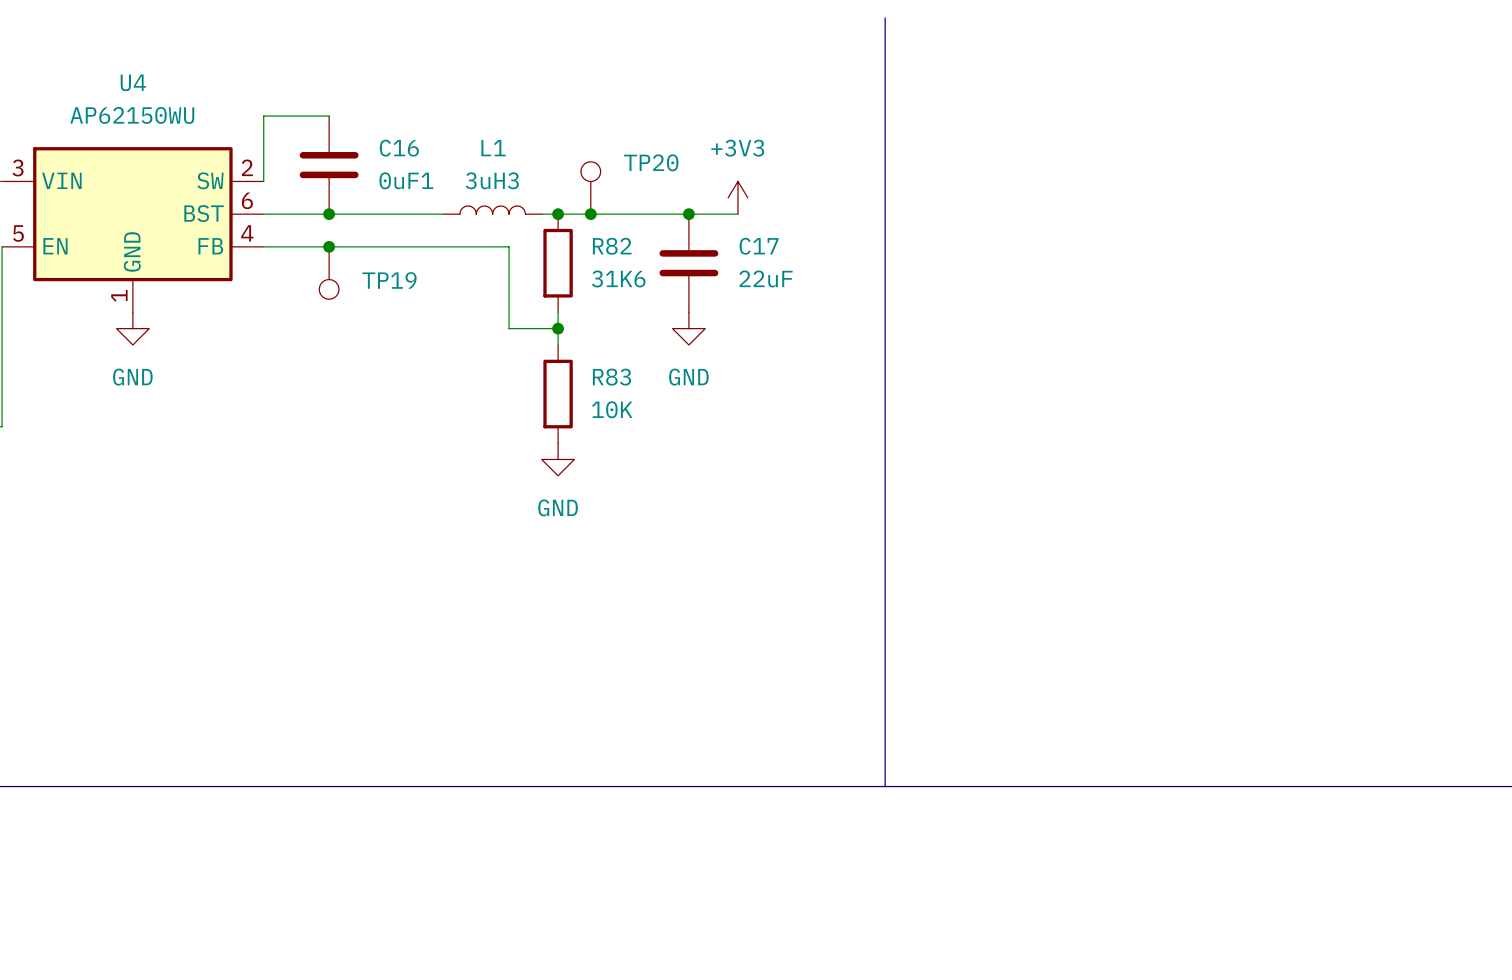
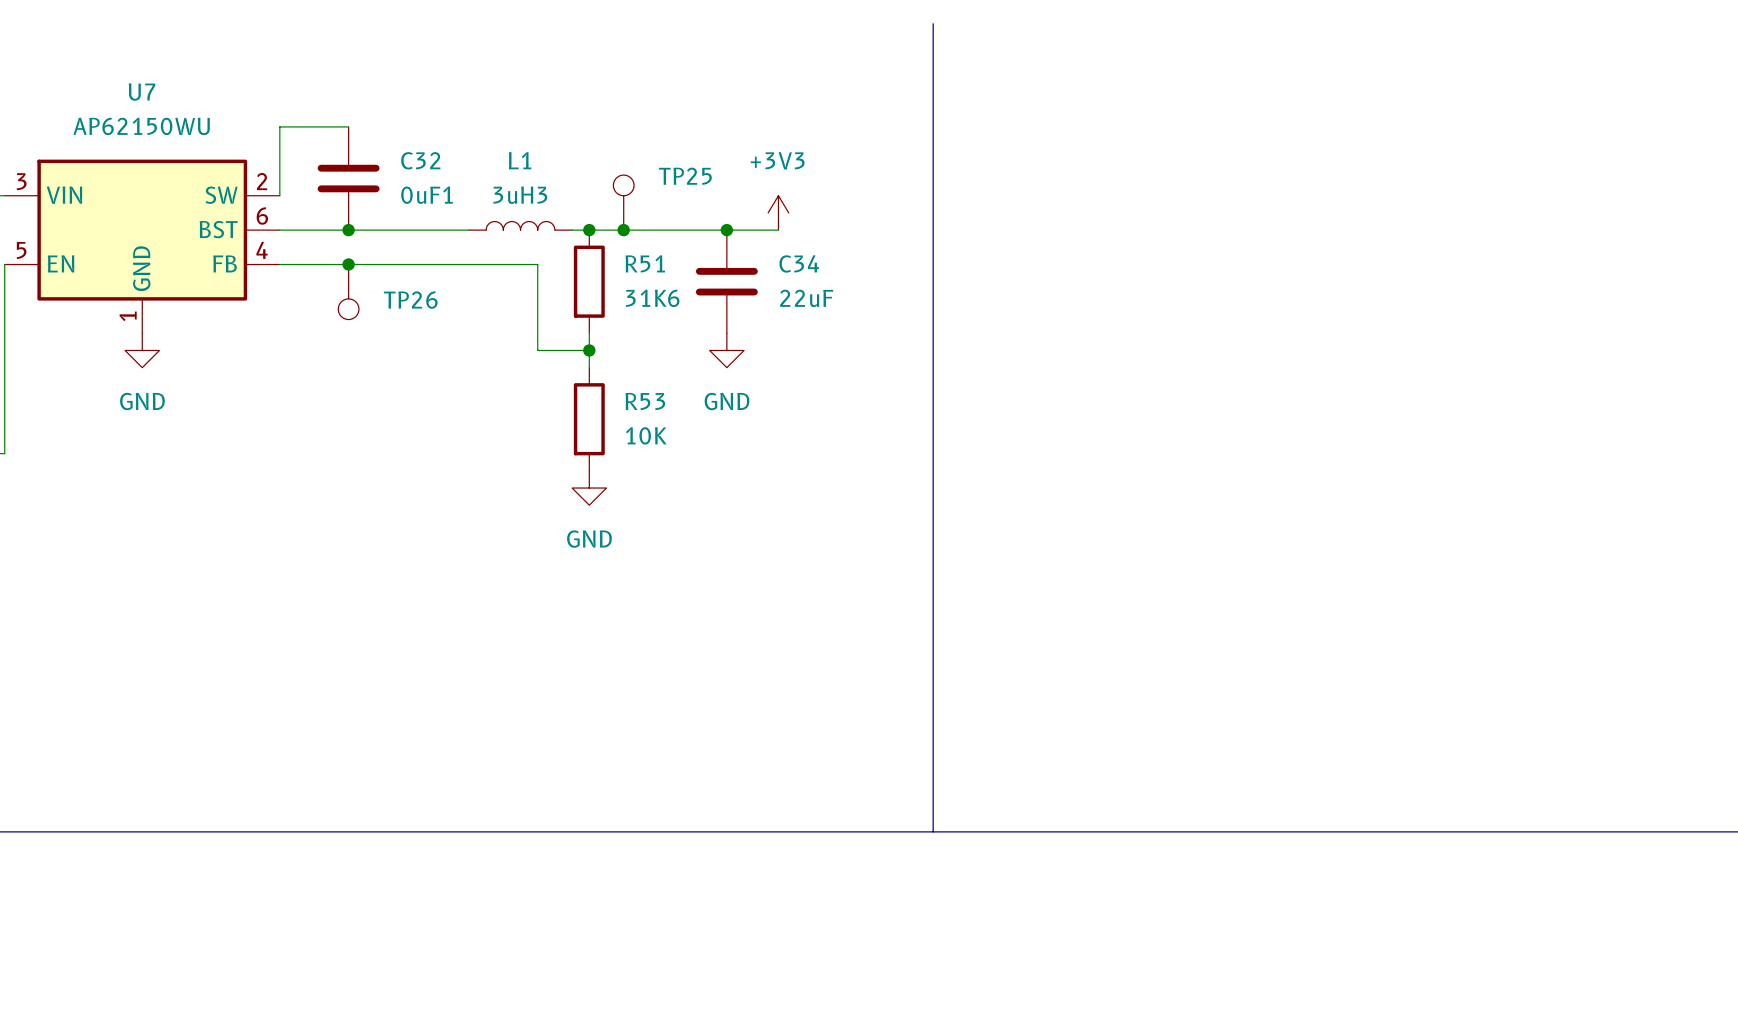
U4 name: U4 (133, 82) -> U7 (141, 92)
C16 name: C16 (399, 148) -> C32 (420, 160)
TP20 name: TP20 (651, 162) -> TP25 (685, 176)
R82 name: R82 (612, 246) -> R51 (645, 263)
C17 name: C17 (759, 246) -> C34 (799, 263)
TP19 name: TP19 (389, 280) -> TP26 (410, 300)
R83 name: R83 (611, 377) -> R53 (645, 401)

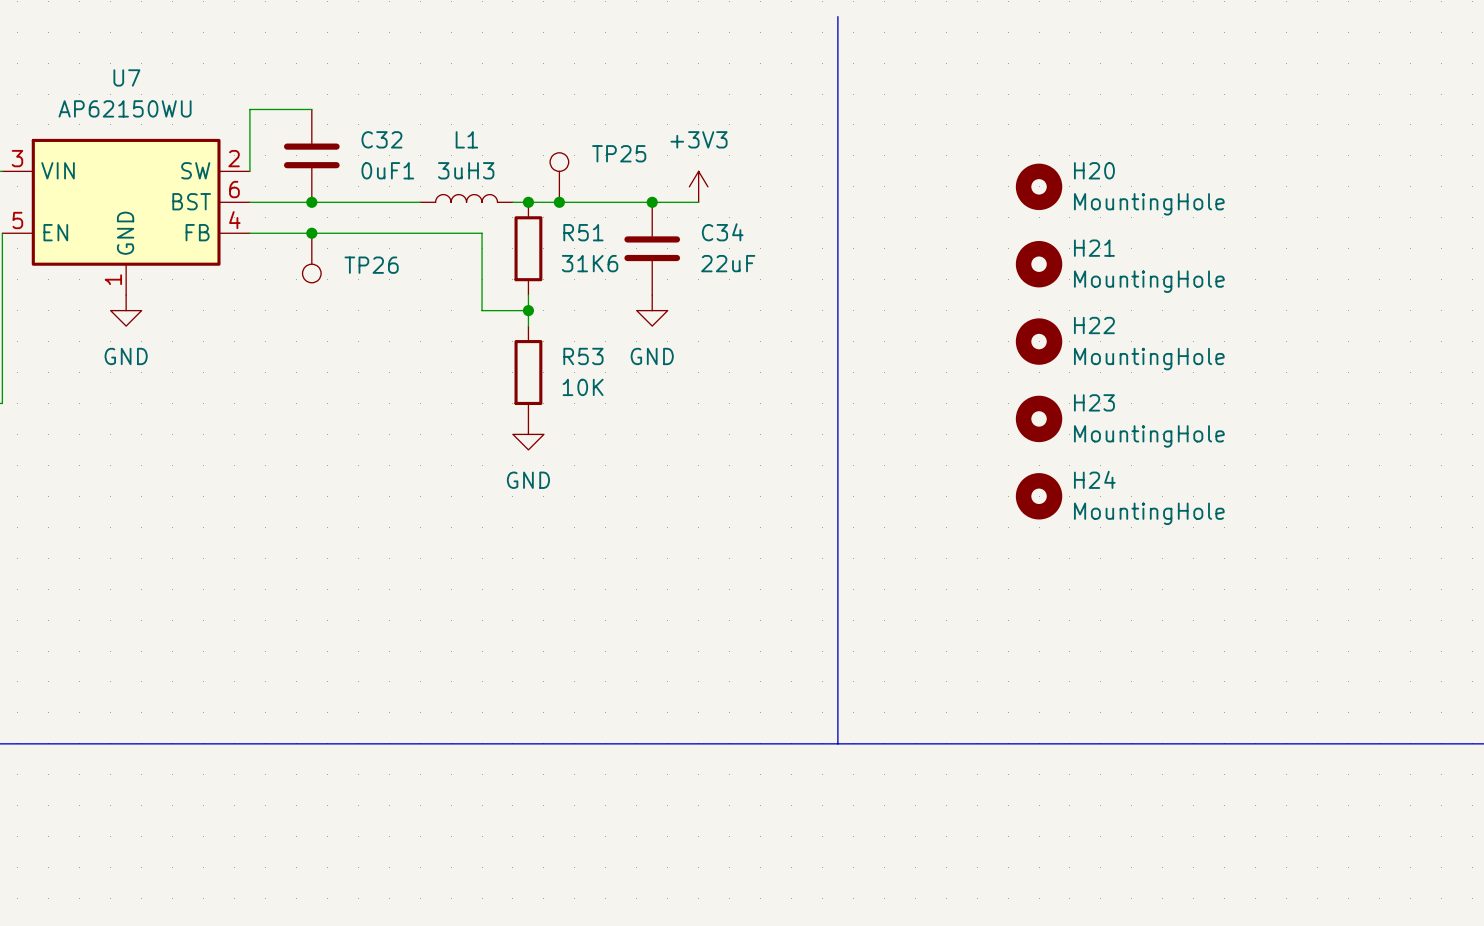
H20: none -> MountingHole (1039, 186)
H21: none -> MountingHole (1039, 264)
H22: none -> MountingHole (1039, 341)
H23: none -> MountingHole (1039, 418)
H24: none -> MountingHole (1039, 496)

